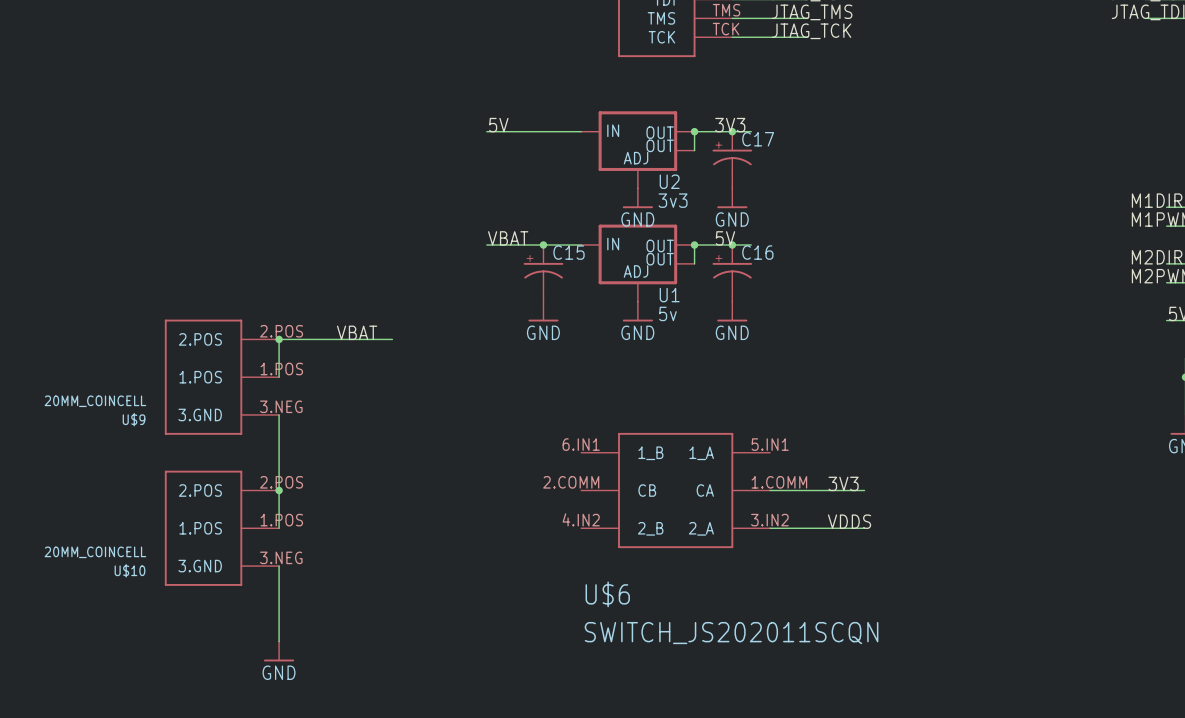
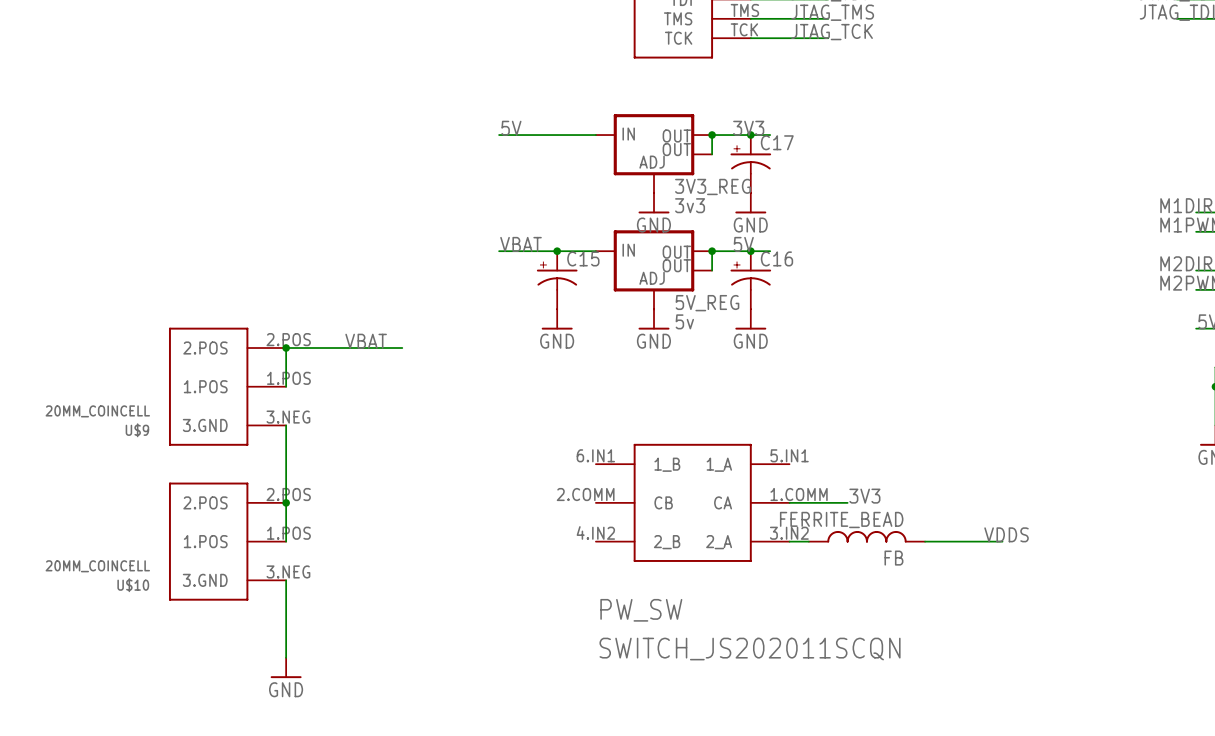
U2 name: U2 (669, 181) -> 3V3_REG (712, 186)
U1 name: U1 (669, 295) -> 5V_REG (707, 303)
wire: (826, 490) (864, 490) -> none
label position: VDDS (849, 521) -> VDDS (1006, 534)
FB: none -> FERRITE_BEAD (866, 536)
wire: (788, 528) (864, 528) -> (925, 541) (1002, 541)
U$6 name: U$6 (607, 594) -> PW_SW (641, 610)

